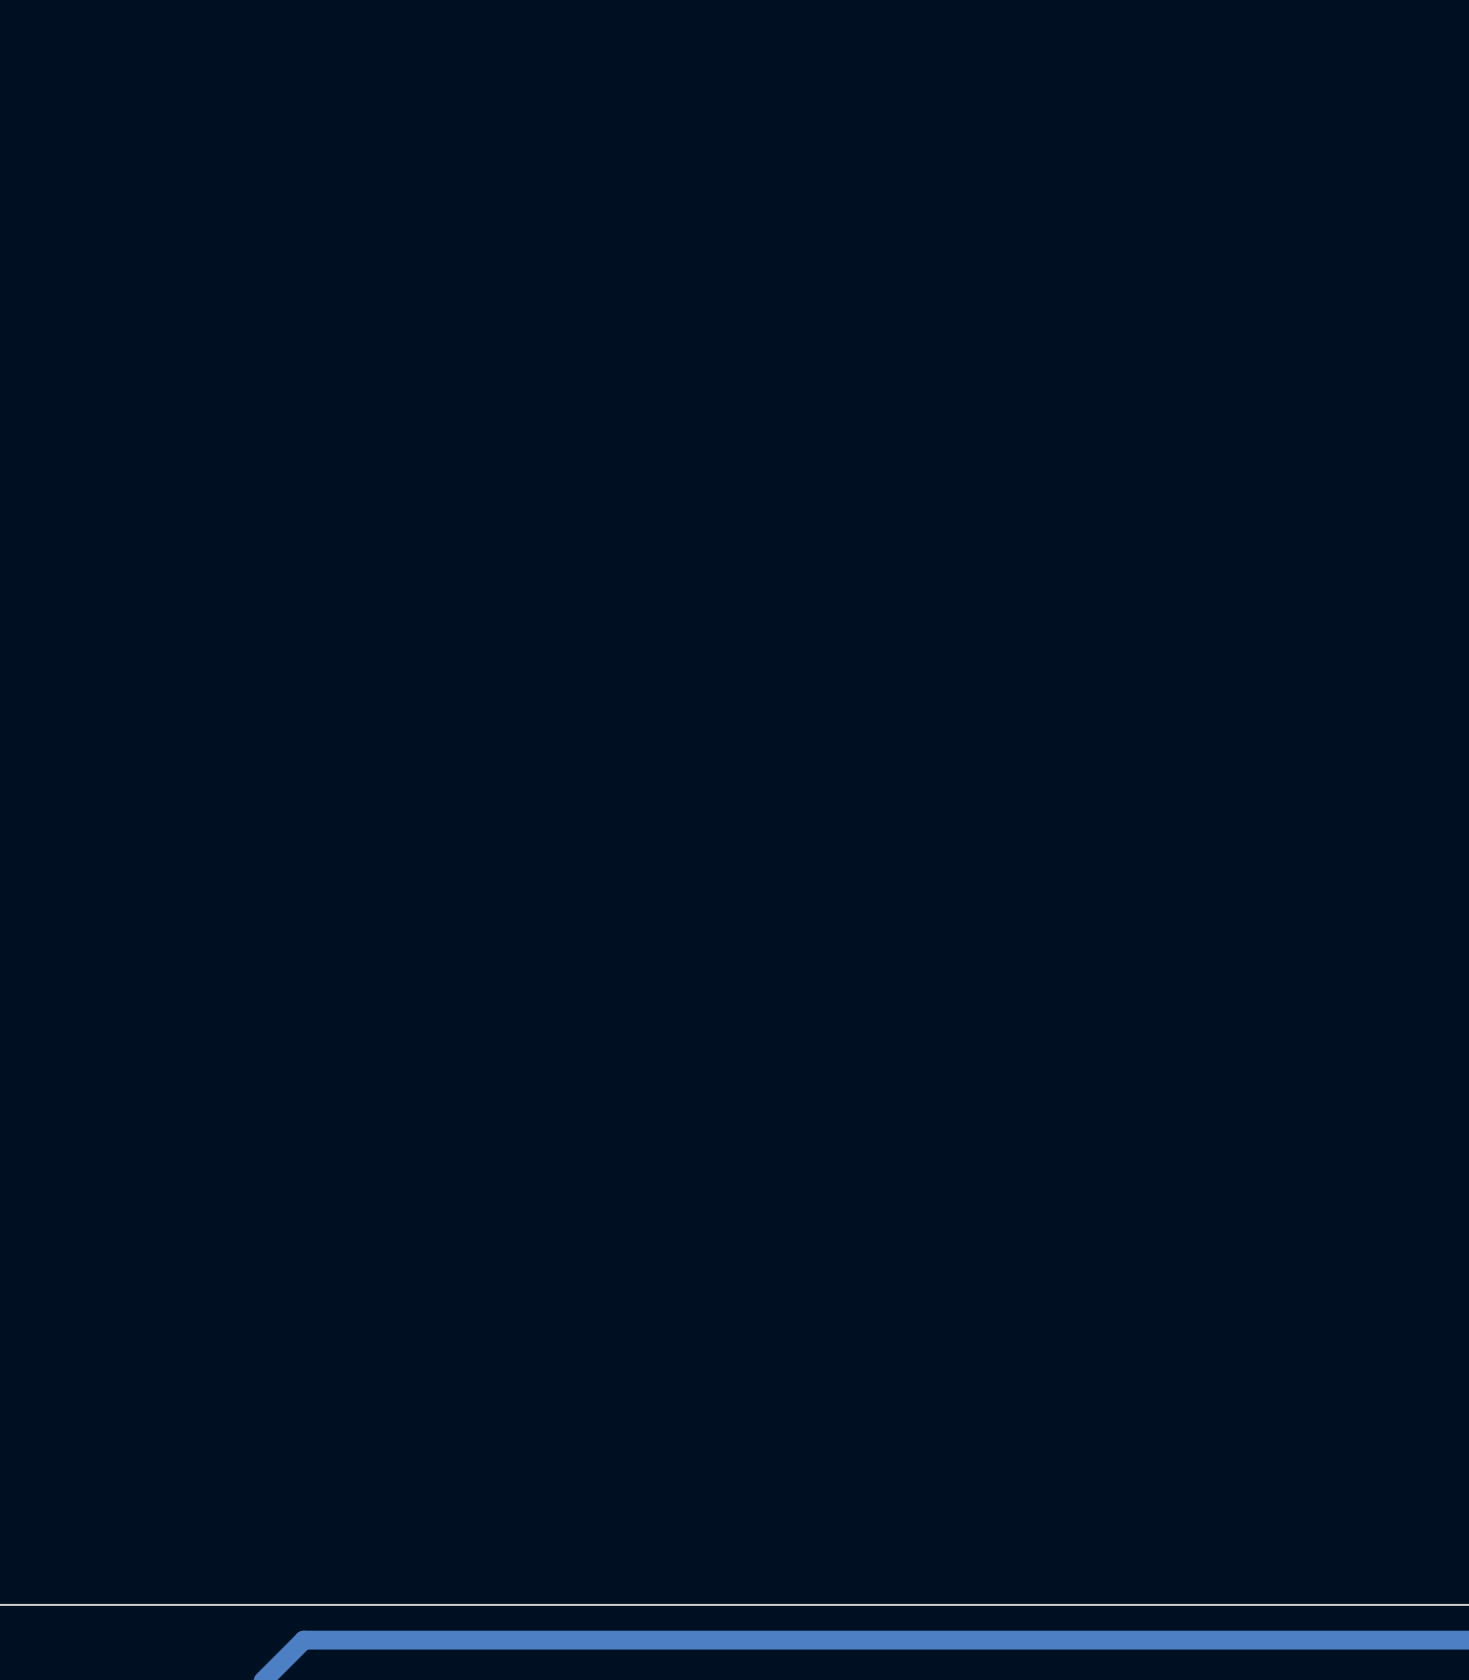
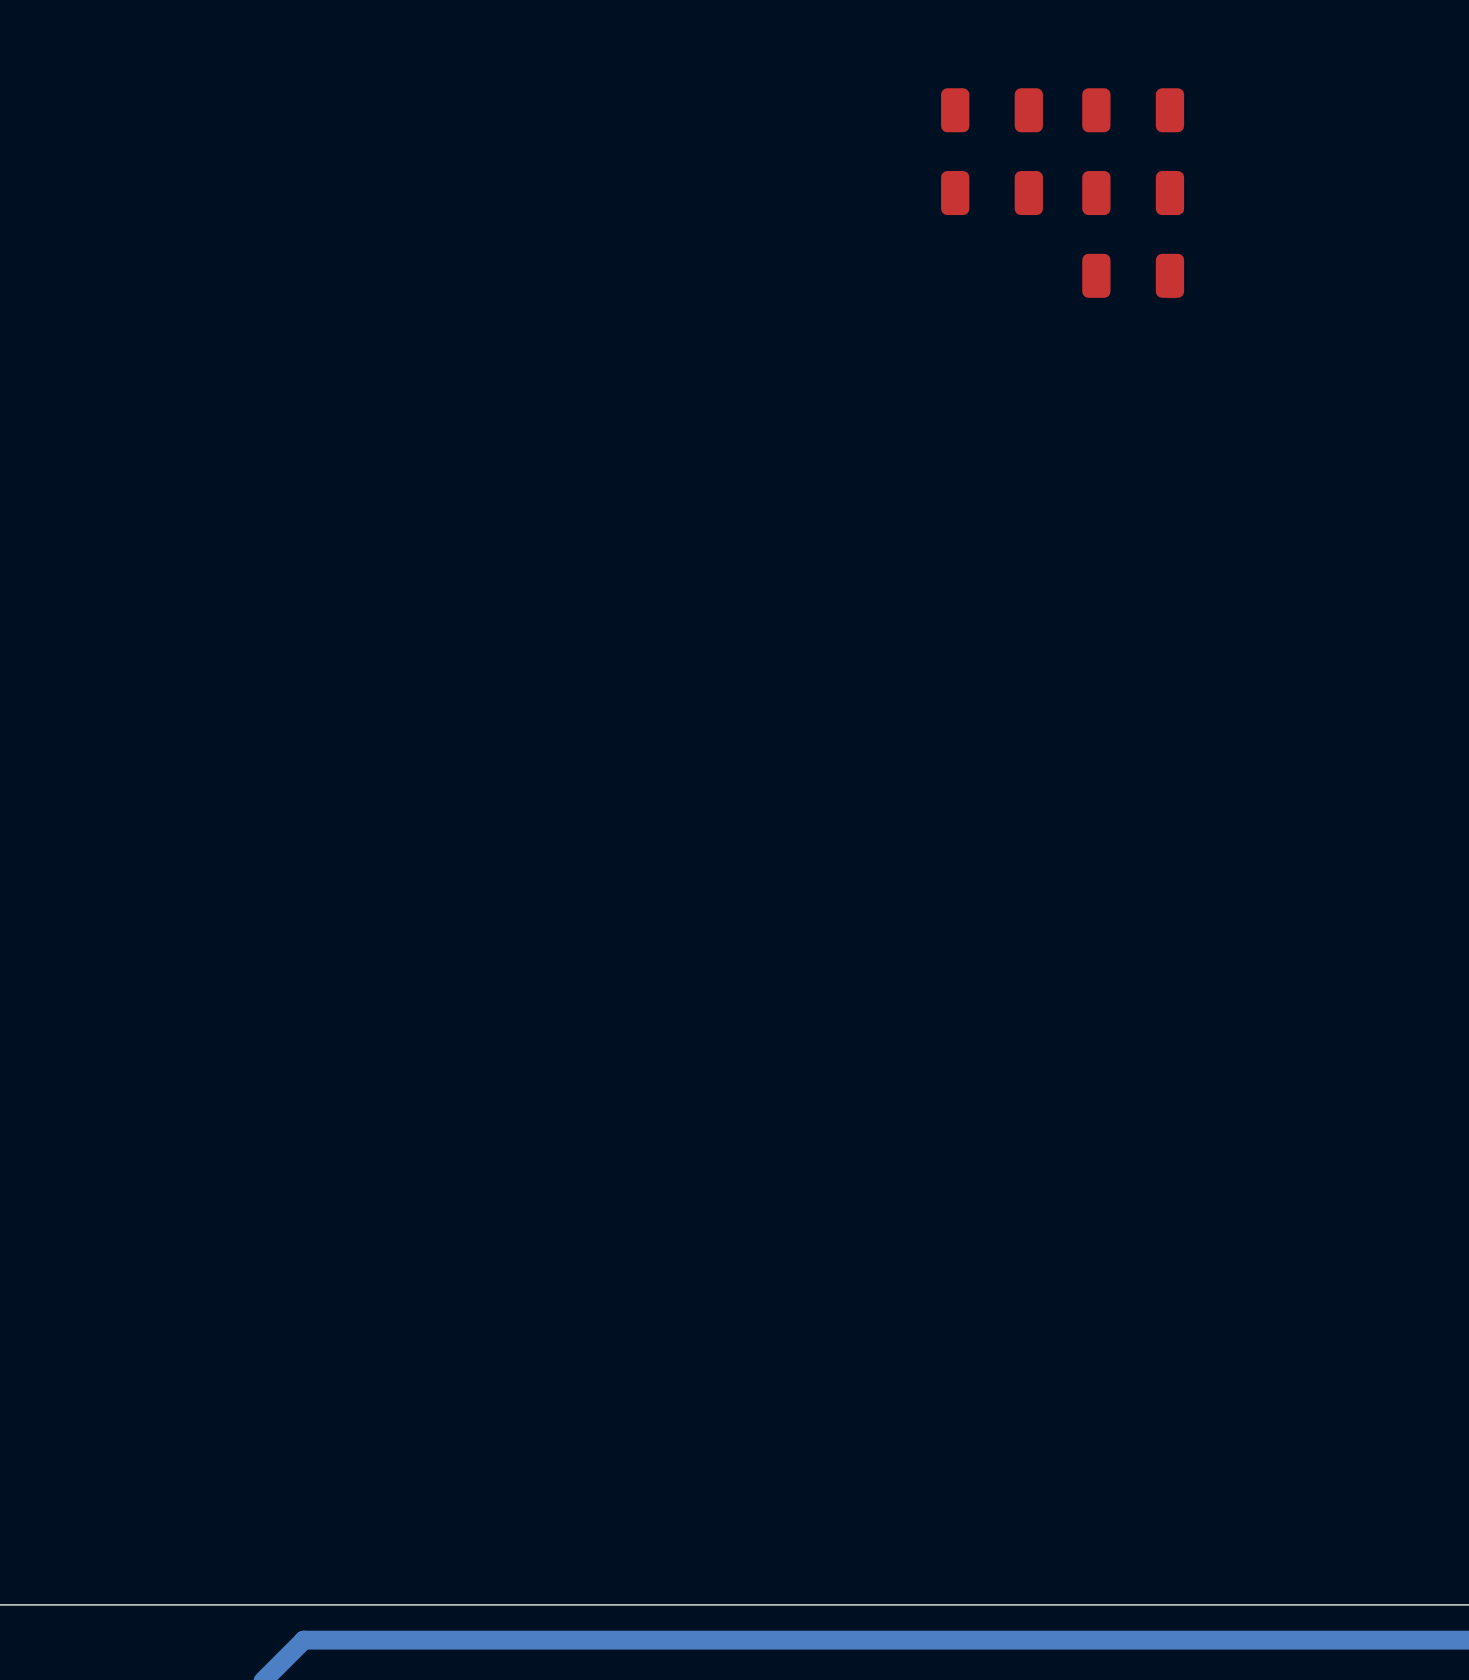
part: none -> (992, 110)
part: none -> (1133, 110)
part: none -> (992, 193)
part: none -> (1133, 193)
part: none -> (1133, 275)

